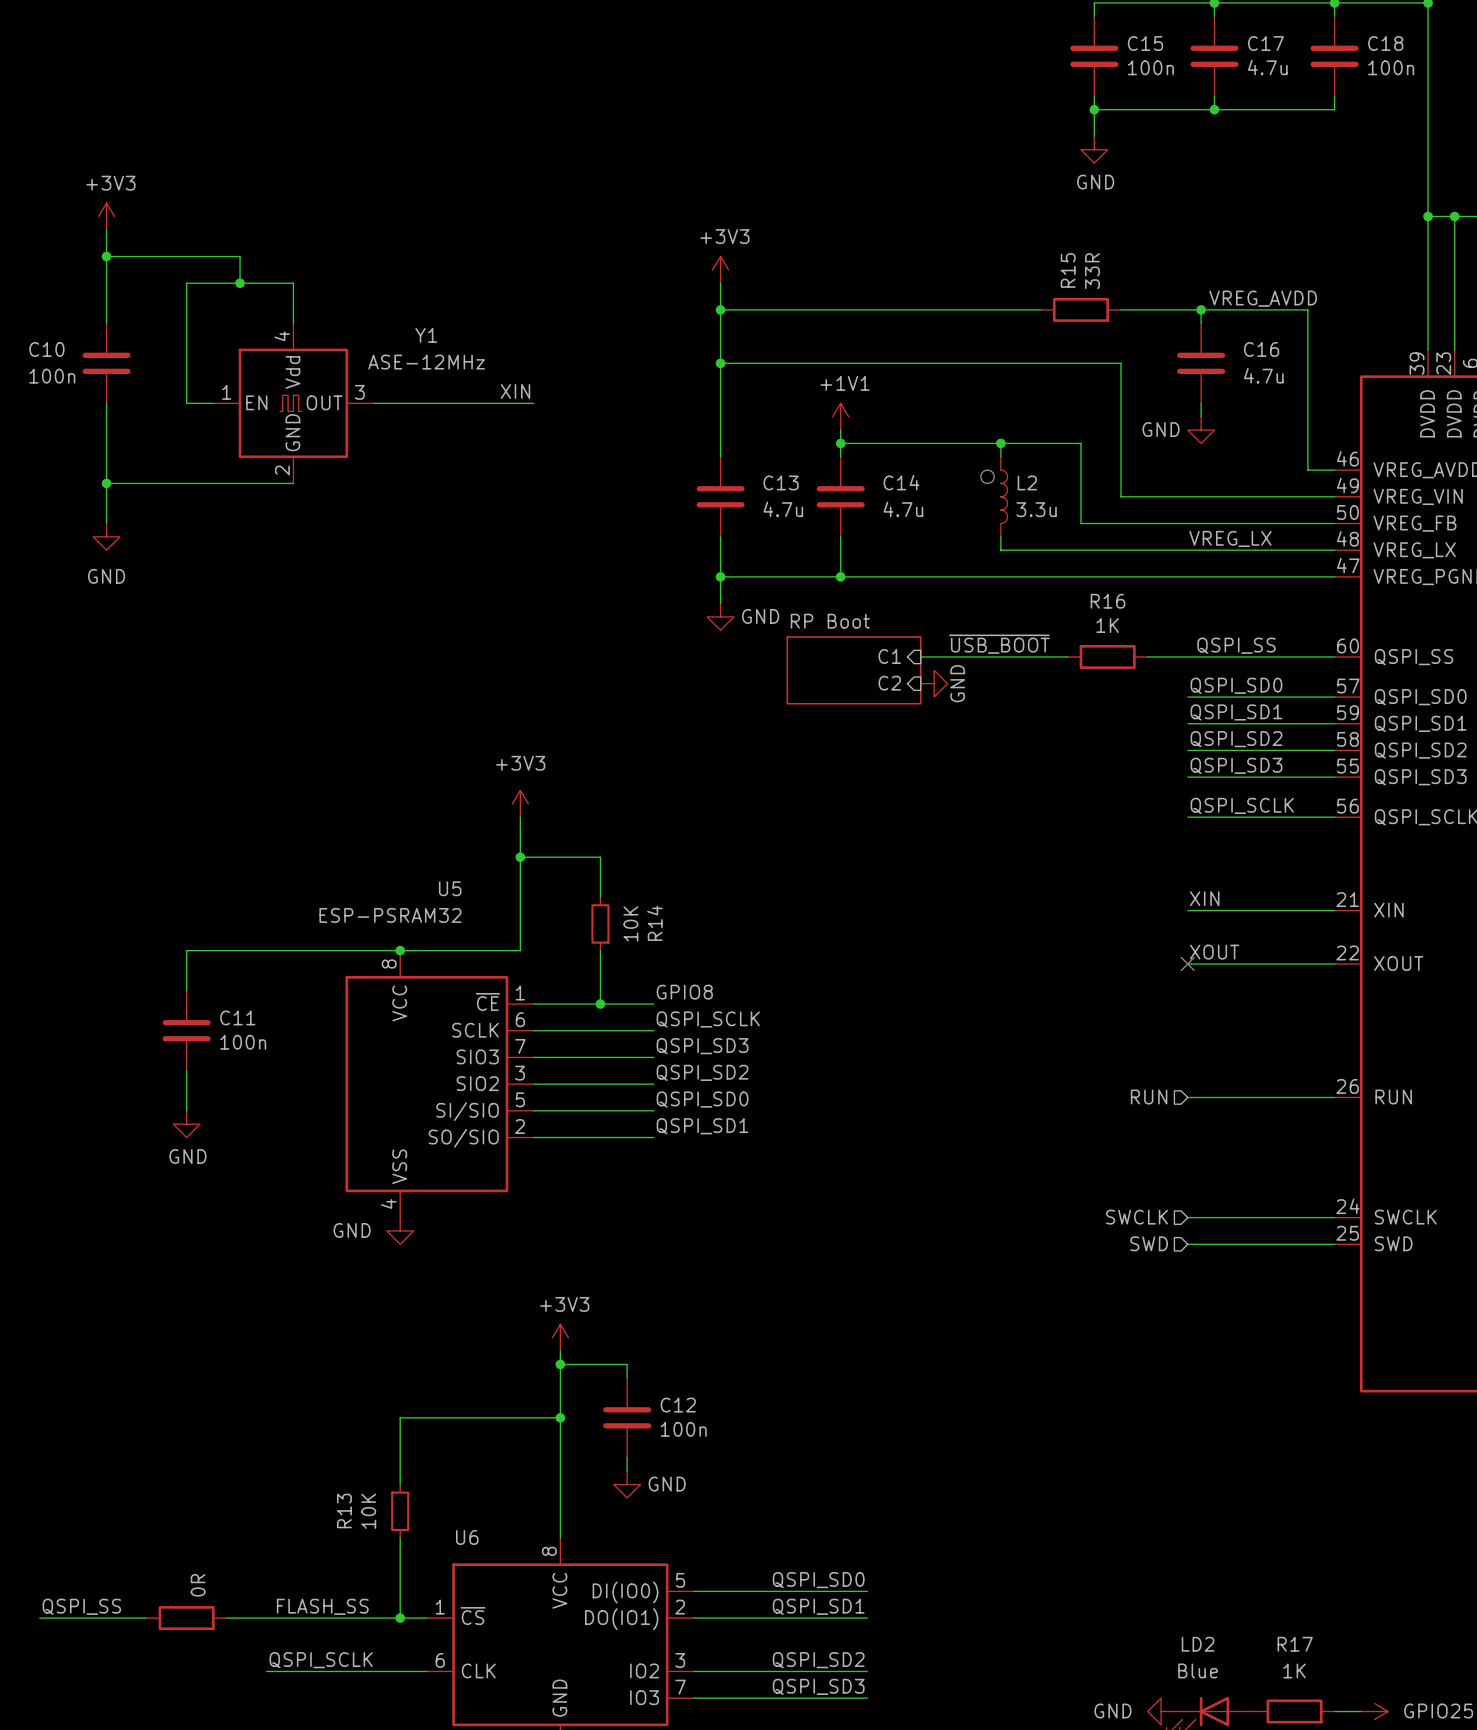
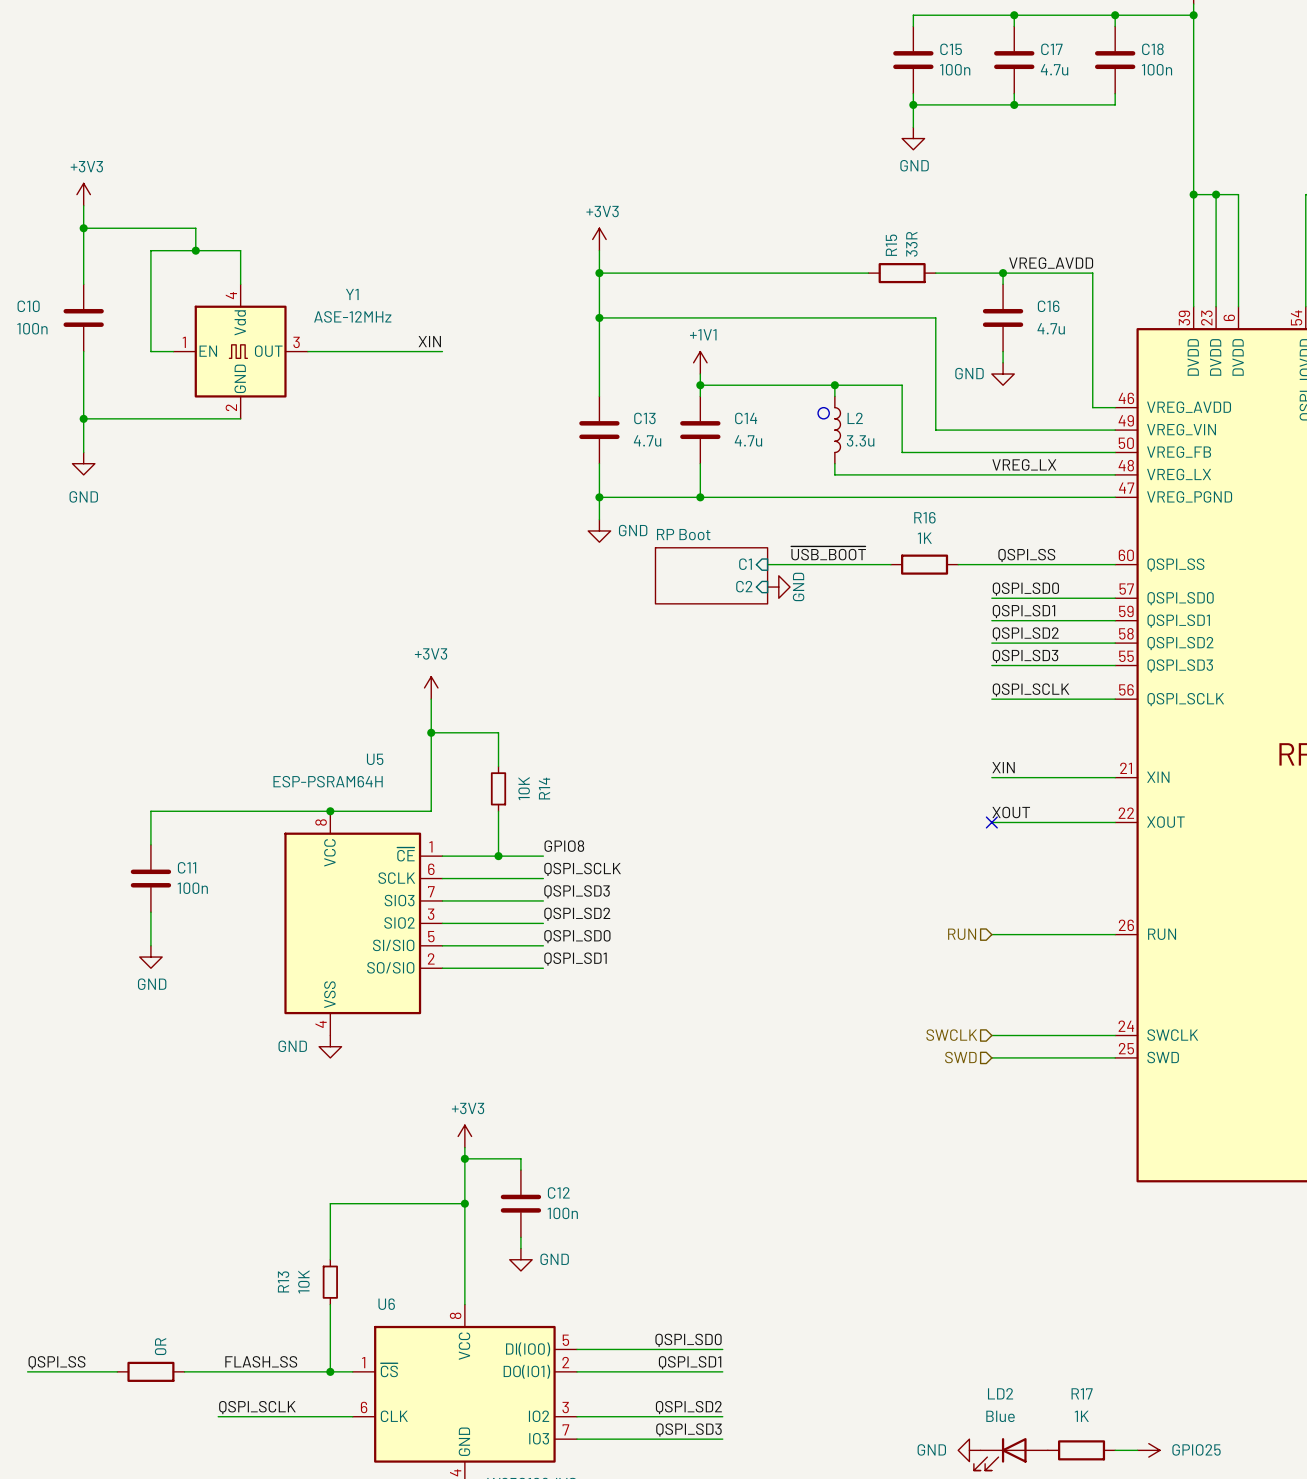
U5 value: ESP-PSRAM32 (390, 915) -> ESP-PSRAM64H (328, 781)

